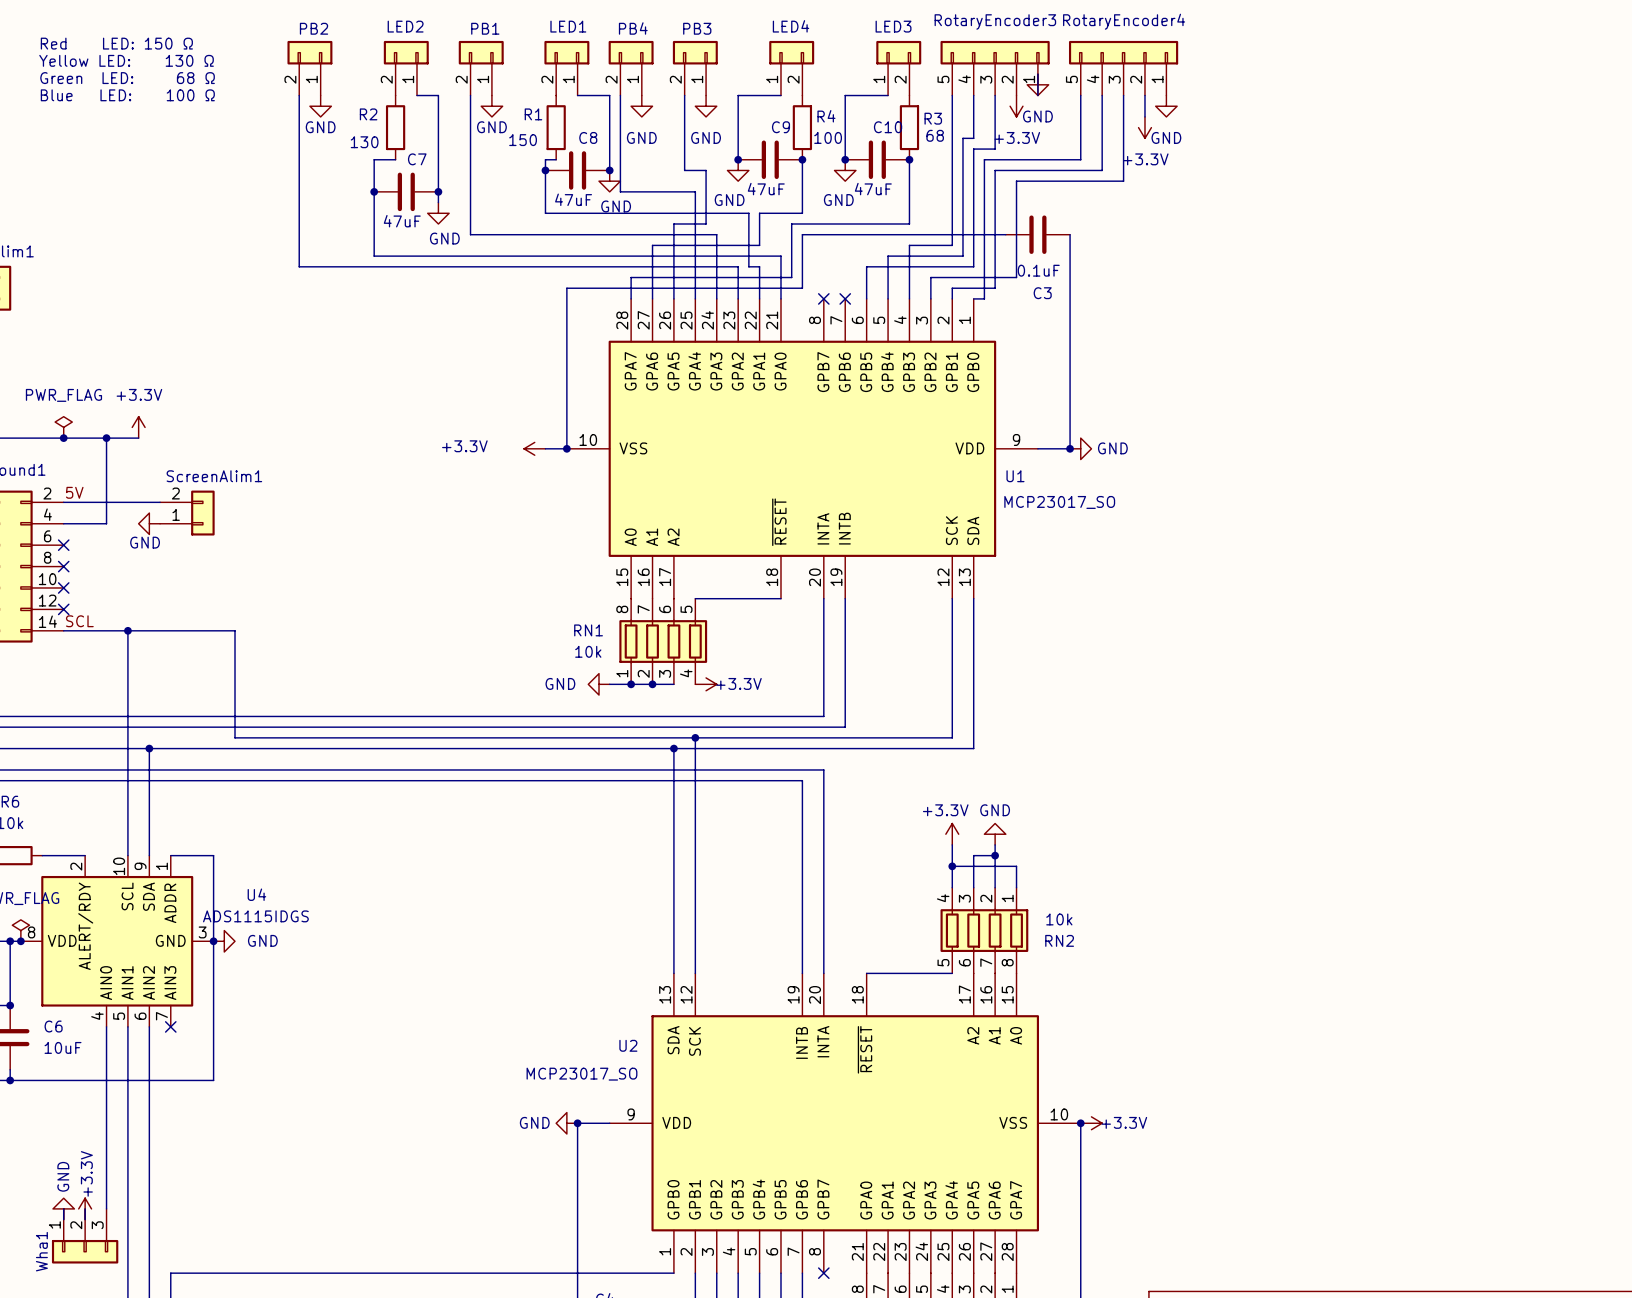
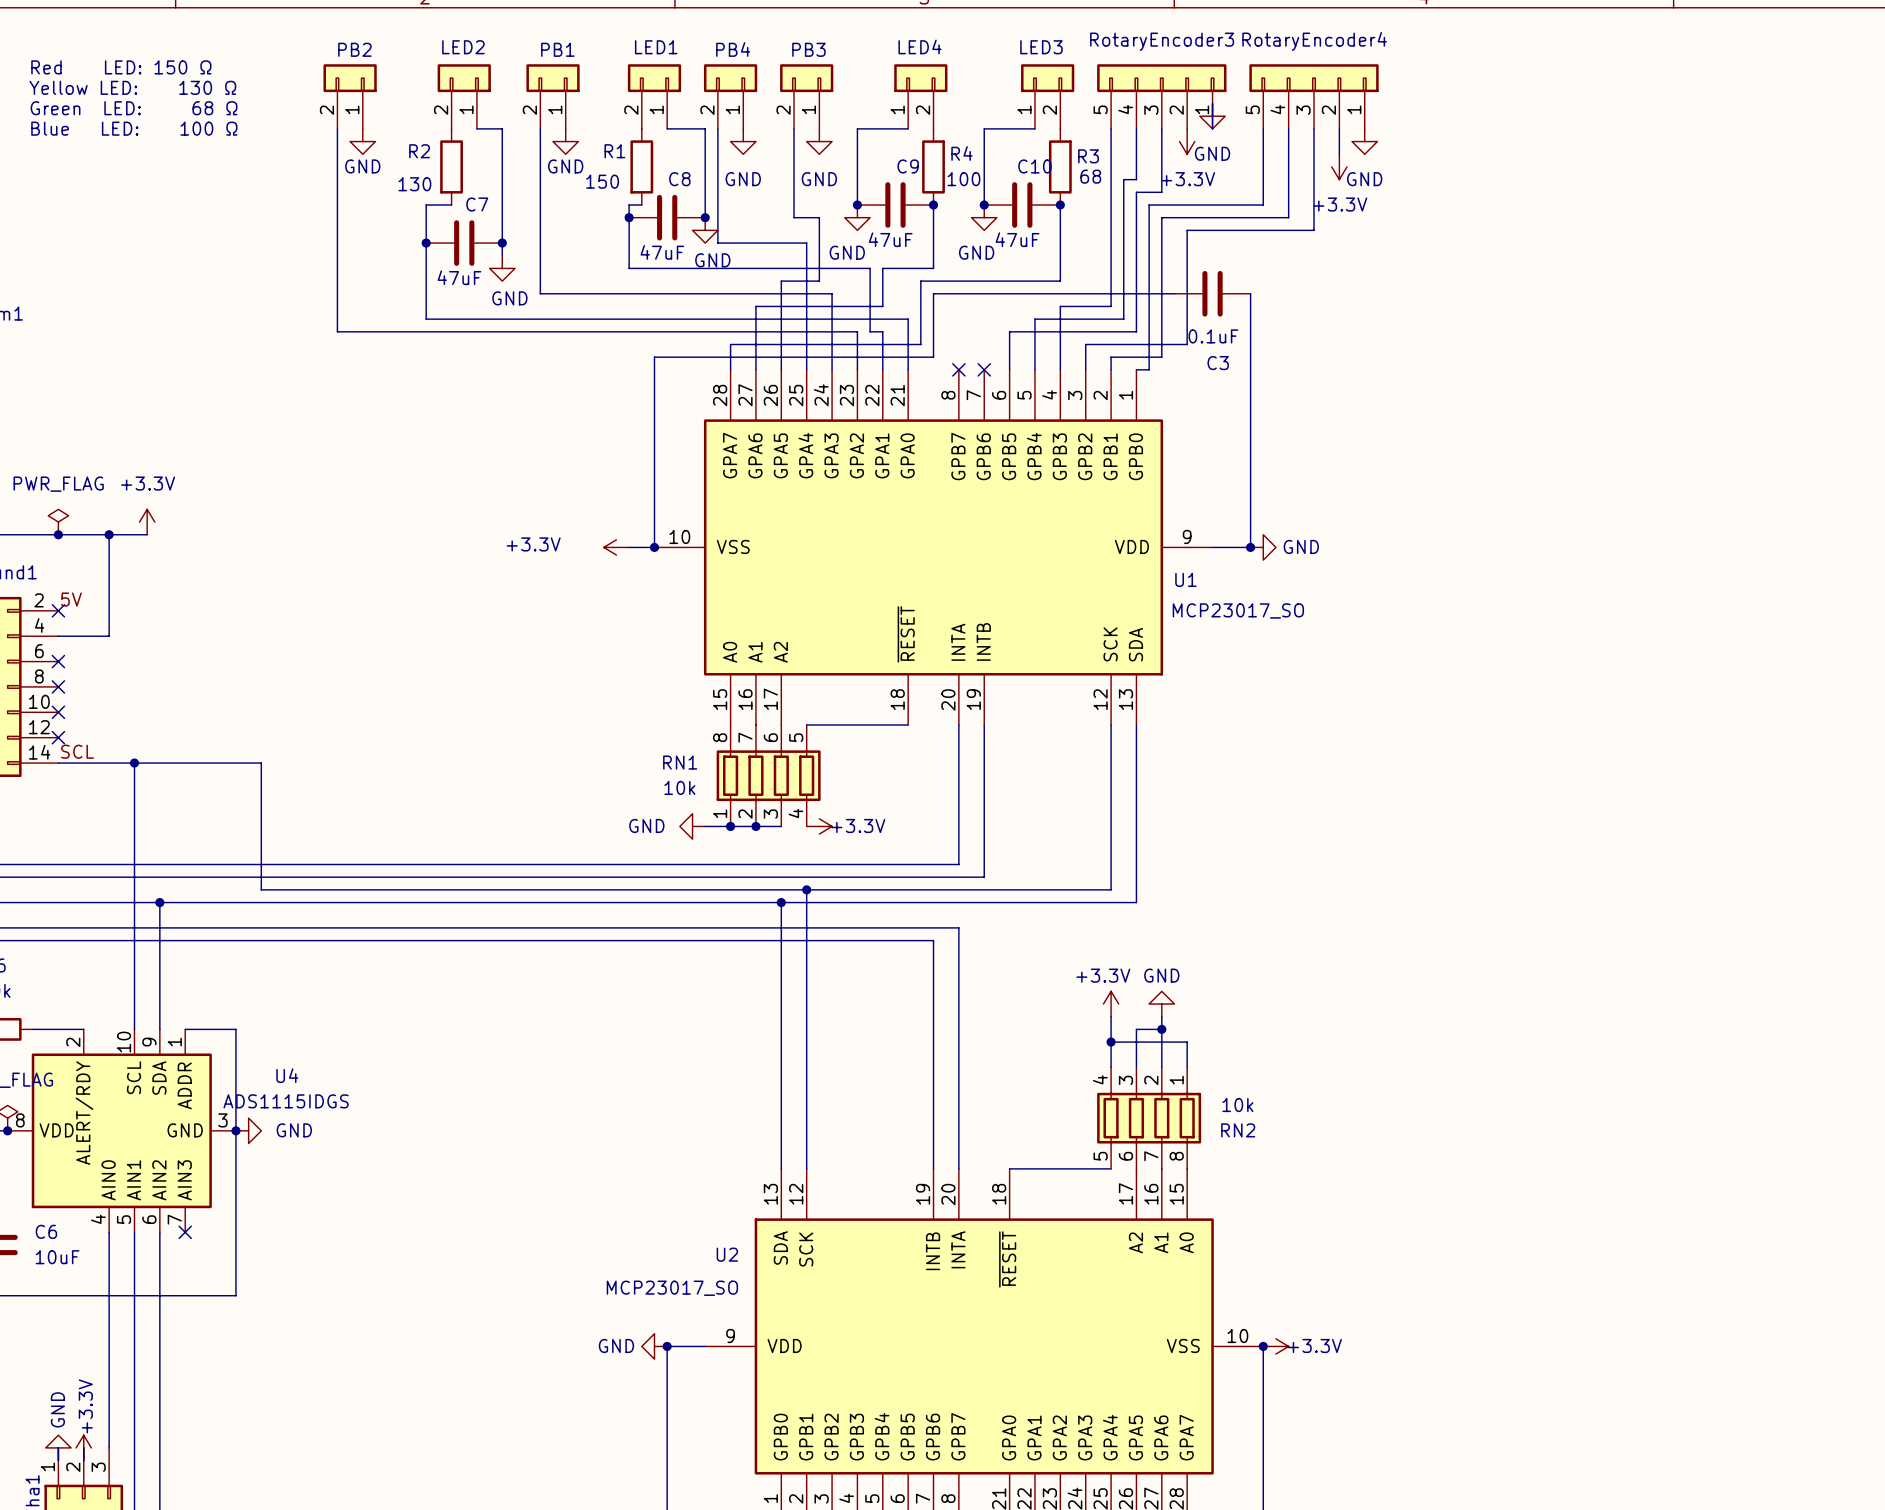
wire: (63, 502) (160, 502) -> none
no-connect mark: none -> (58, 610)
ScreenAlim1: (187, 513) -> none
power symbol: GND (149, 523) -> none

